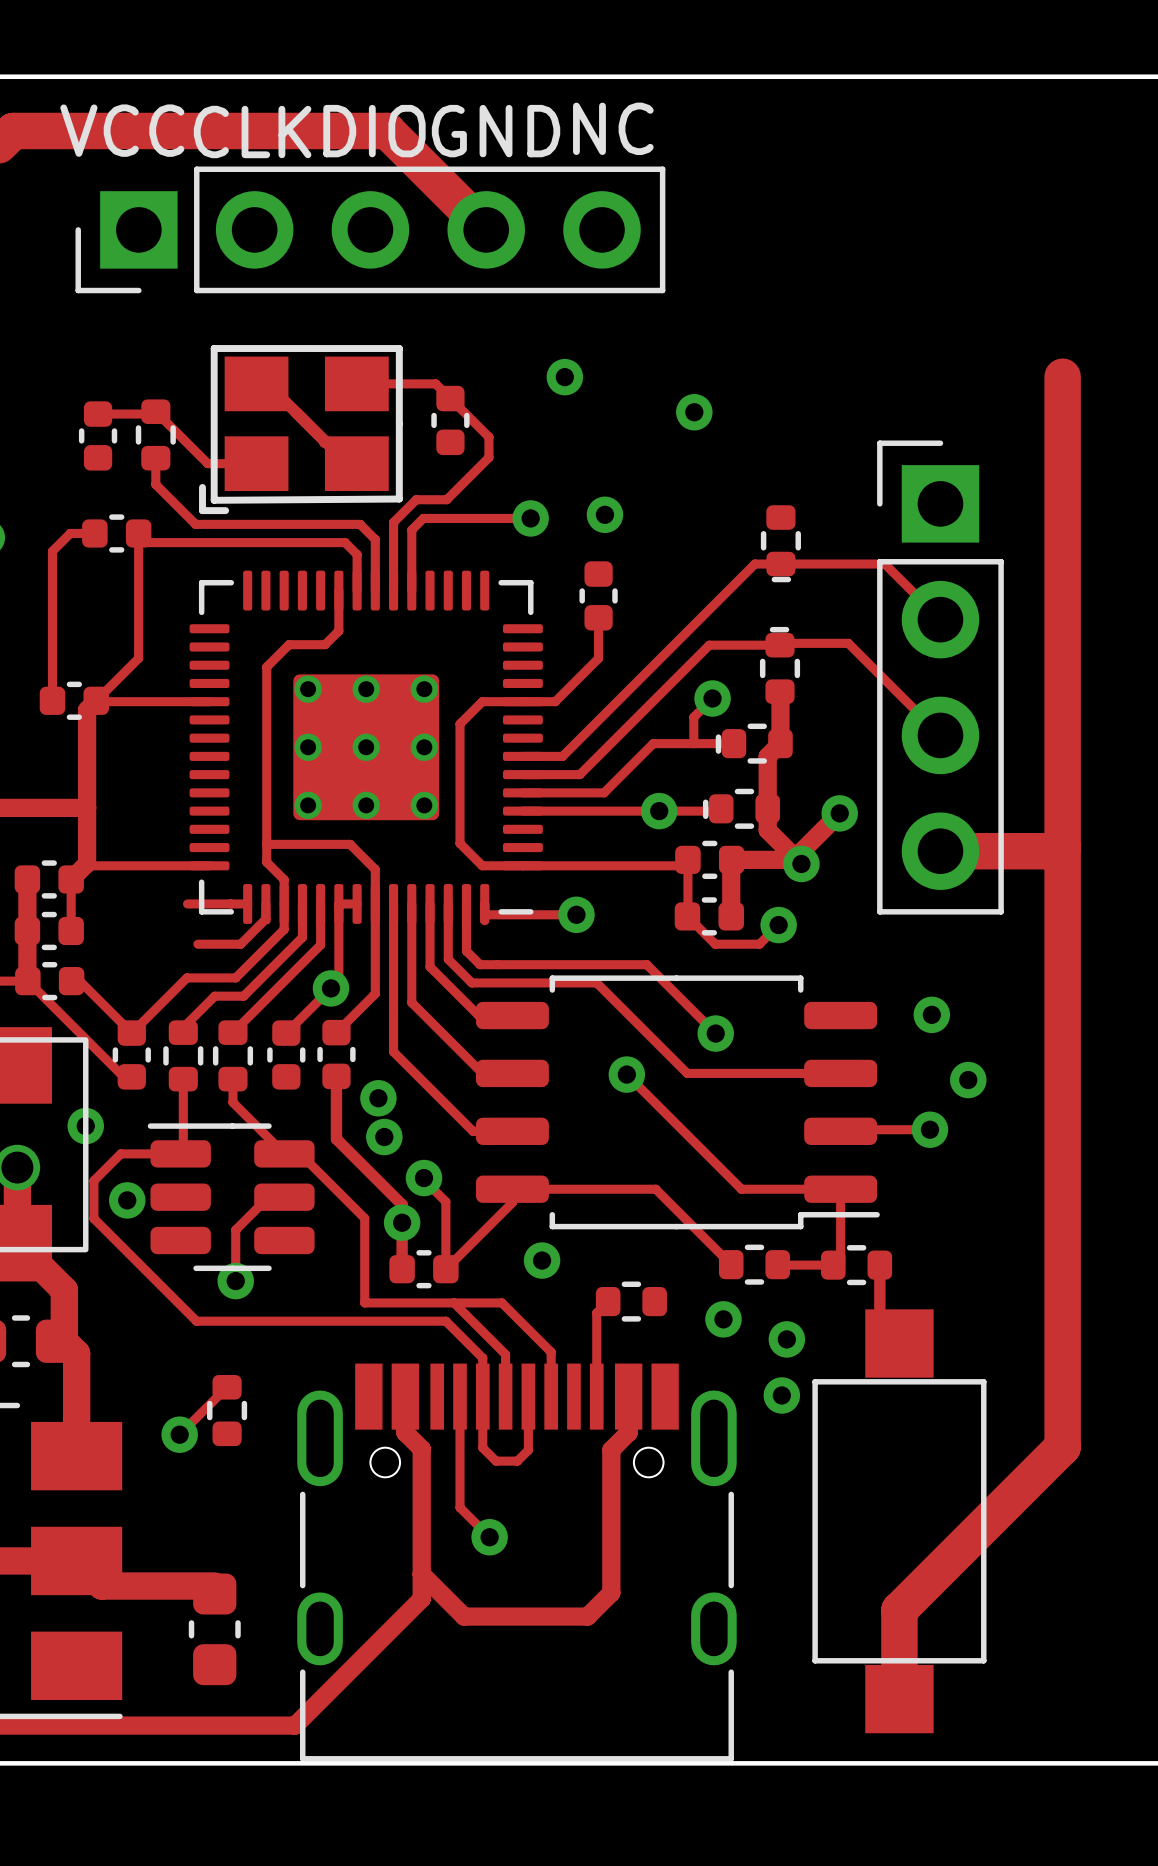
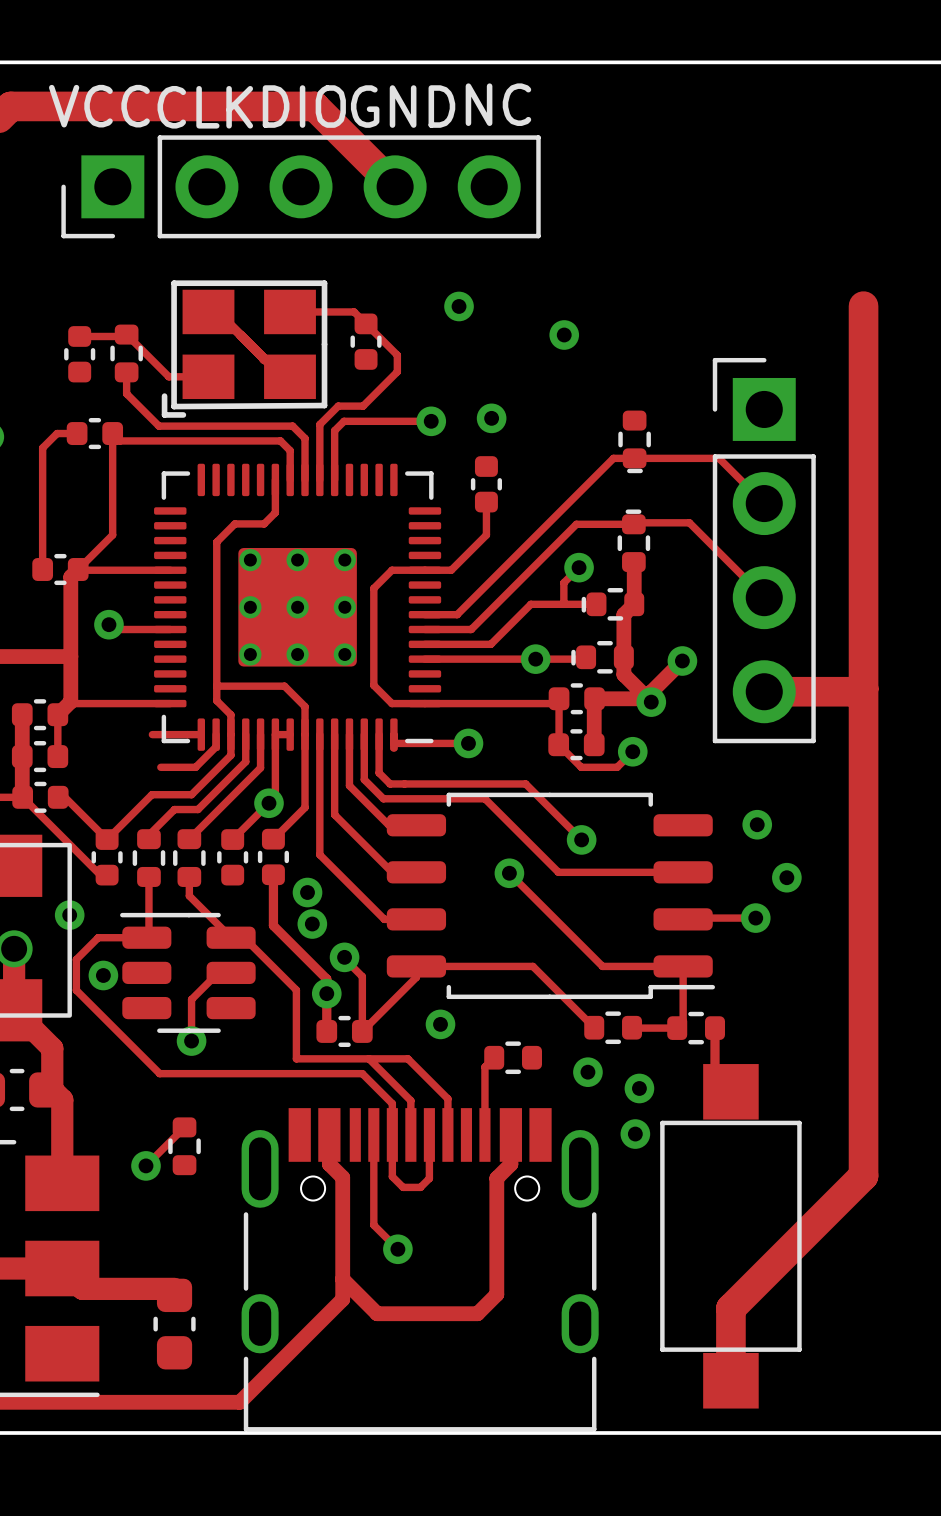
track: none -> (108, 624) (113, 629) (170, 629)
via: none -> (108, 624)

